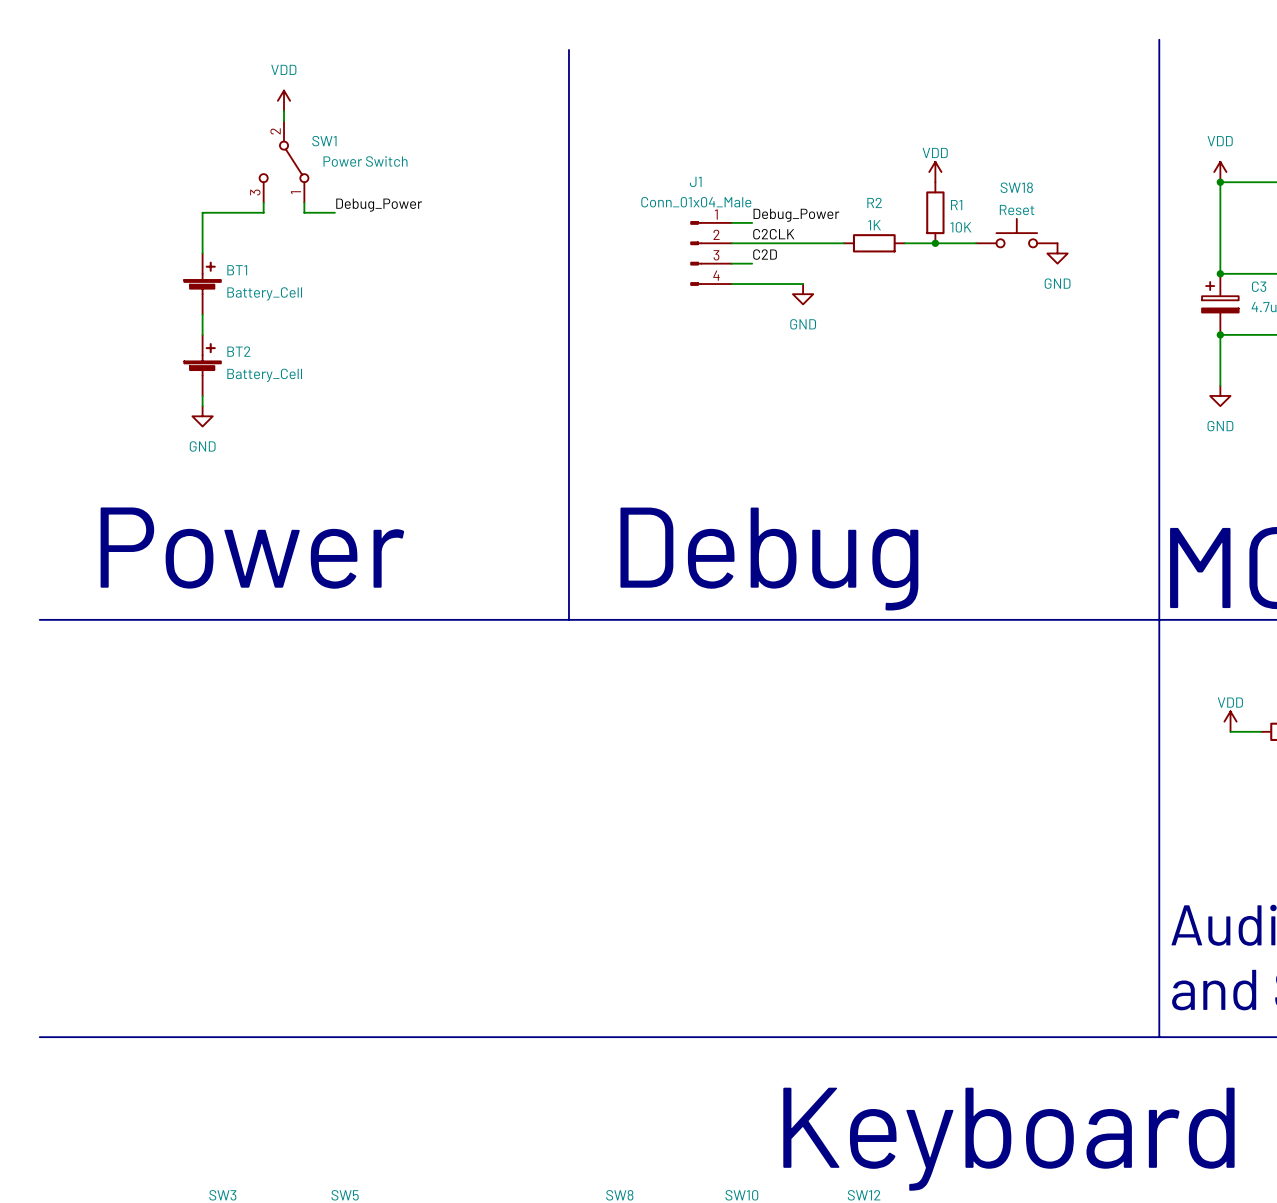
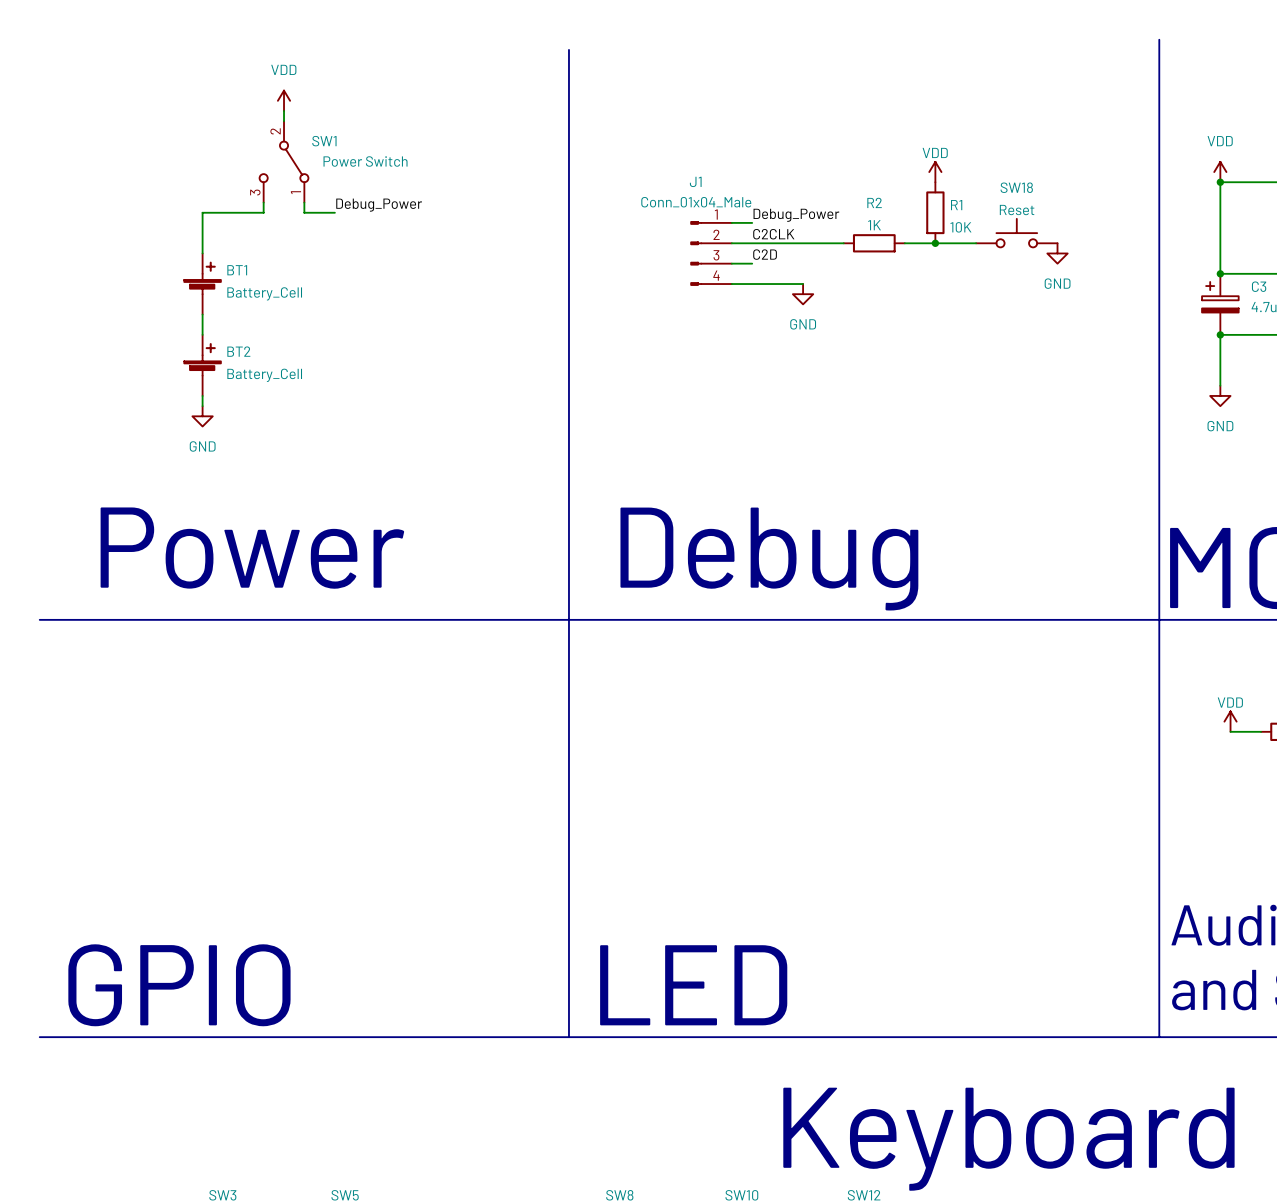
line: none -> (568, 619) (568, 1037)
text: none -> GPIO (179, 985)
text: none -> LED (693, 985)

